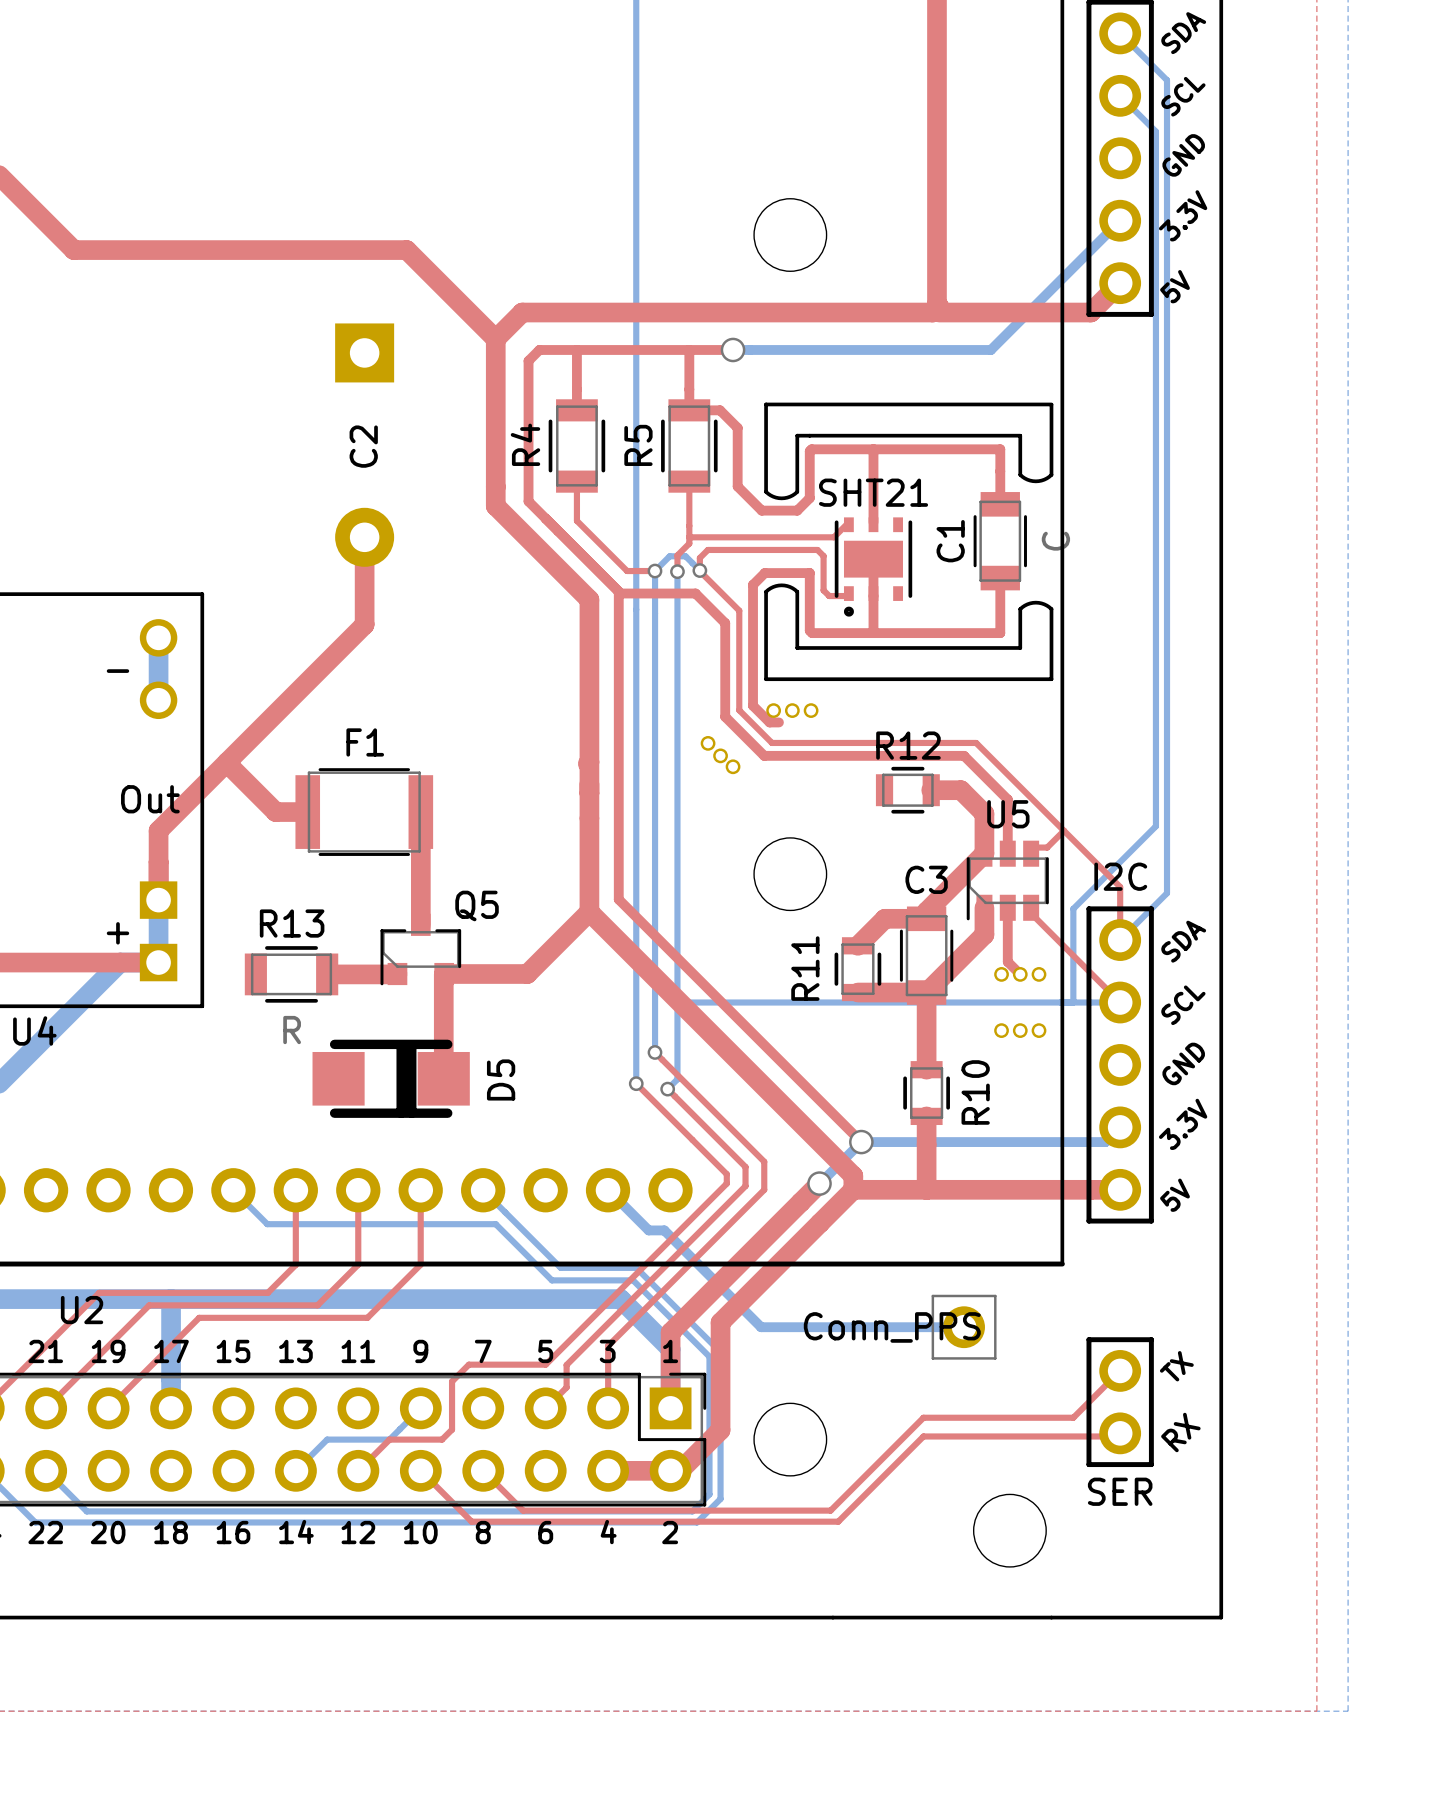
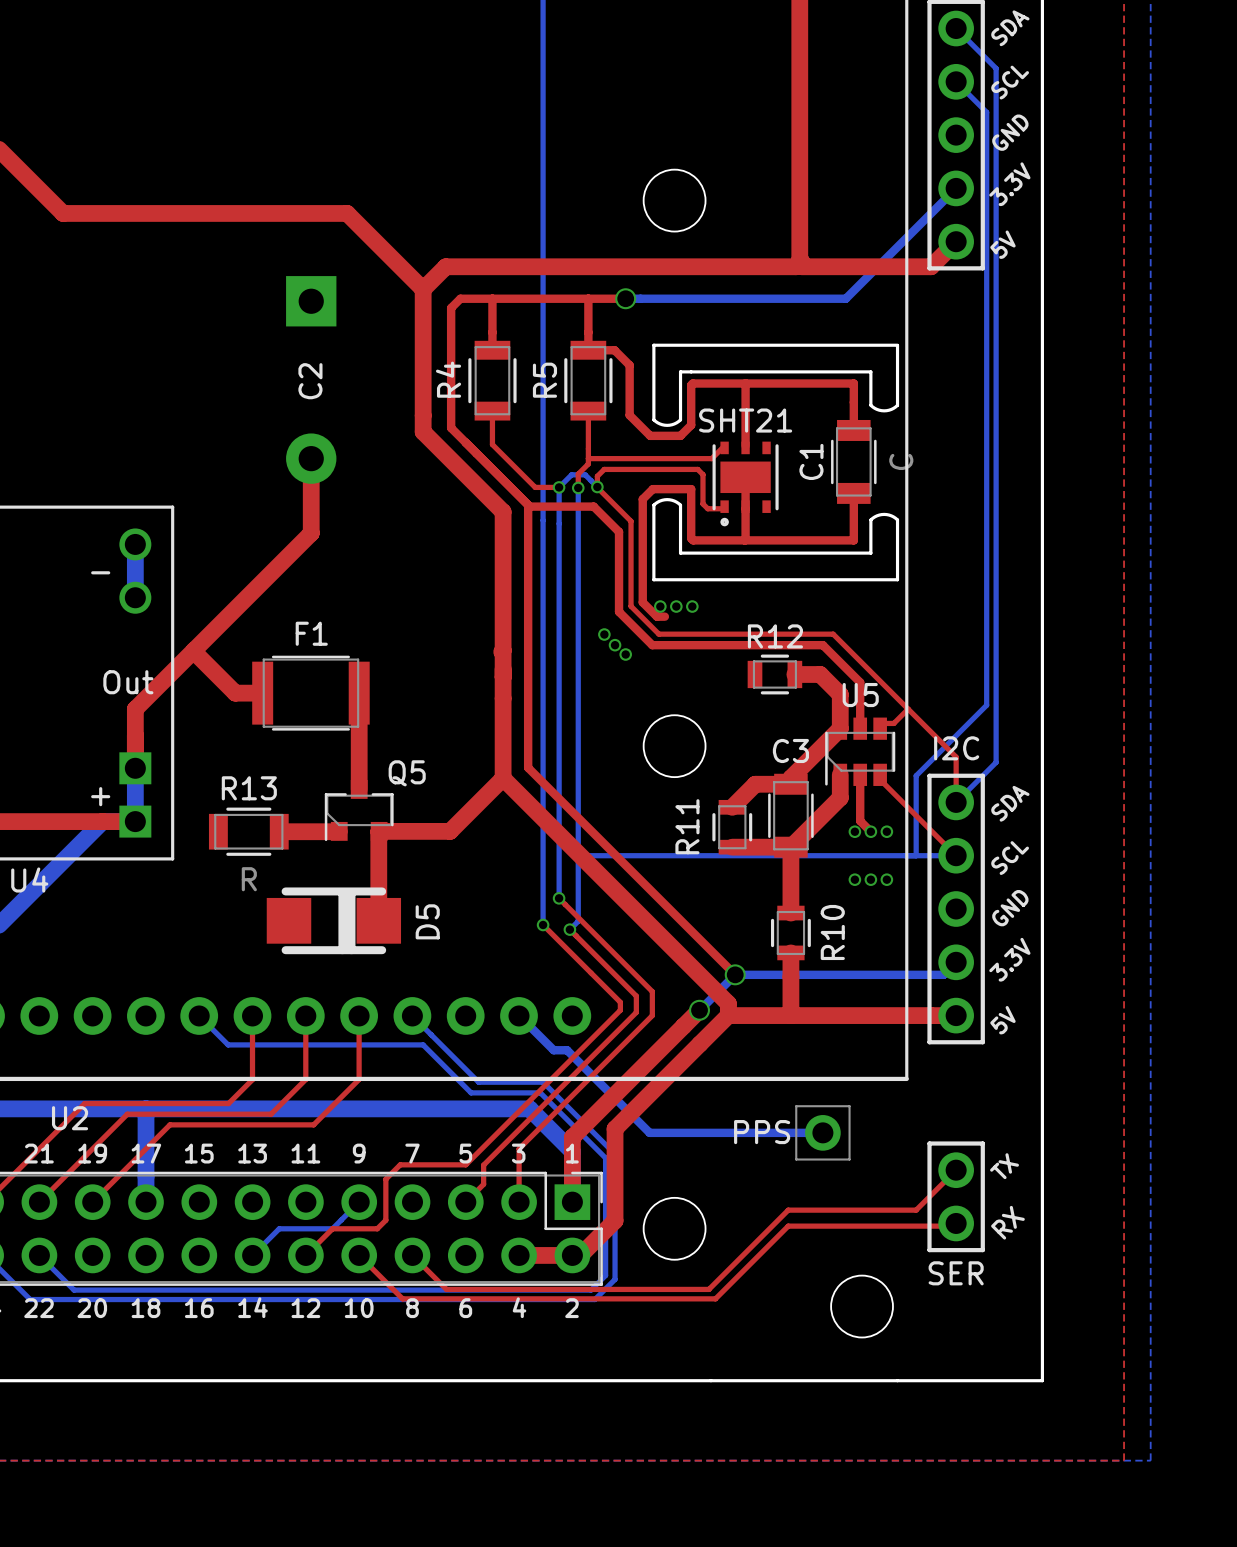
part value: Conn_PPS (892, 1327) -> PPS (762, 1132)

